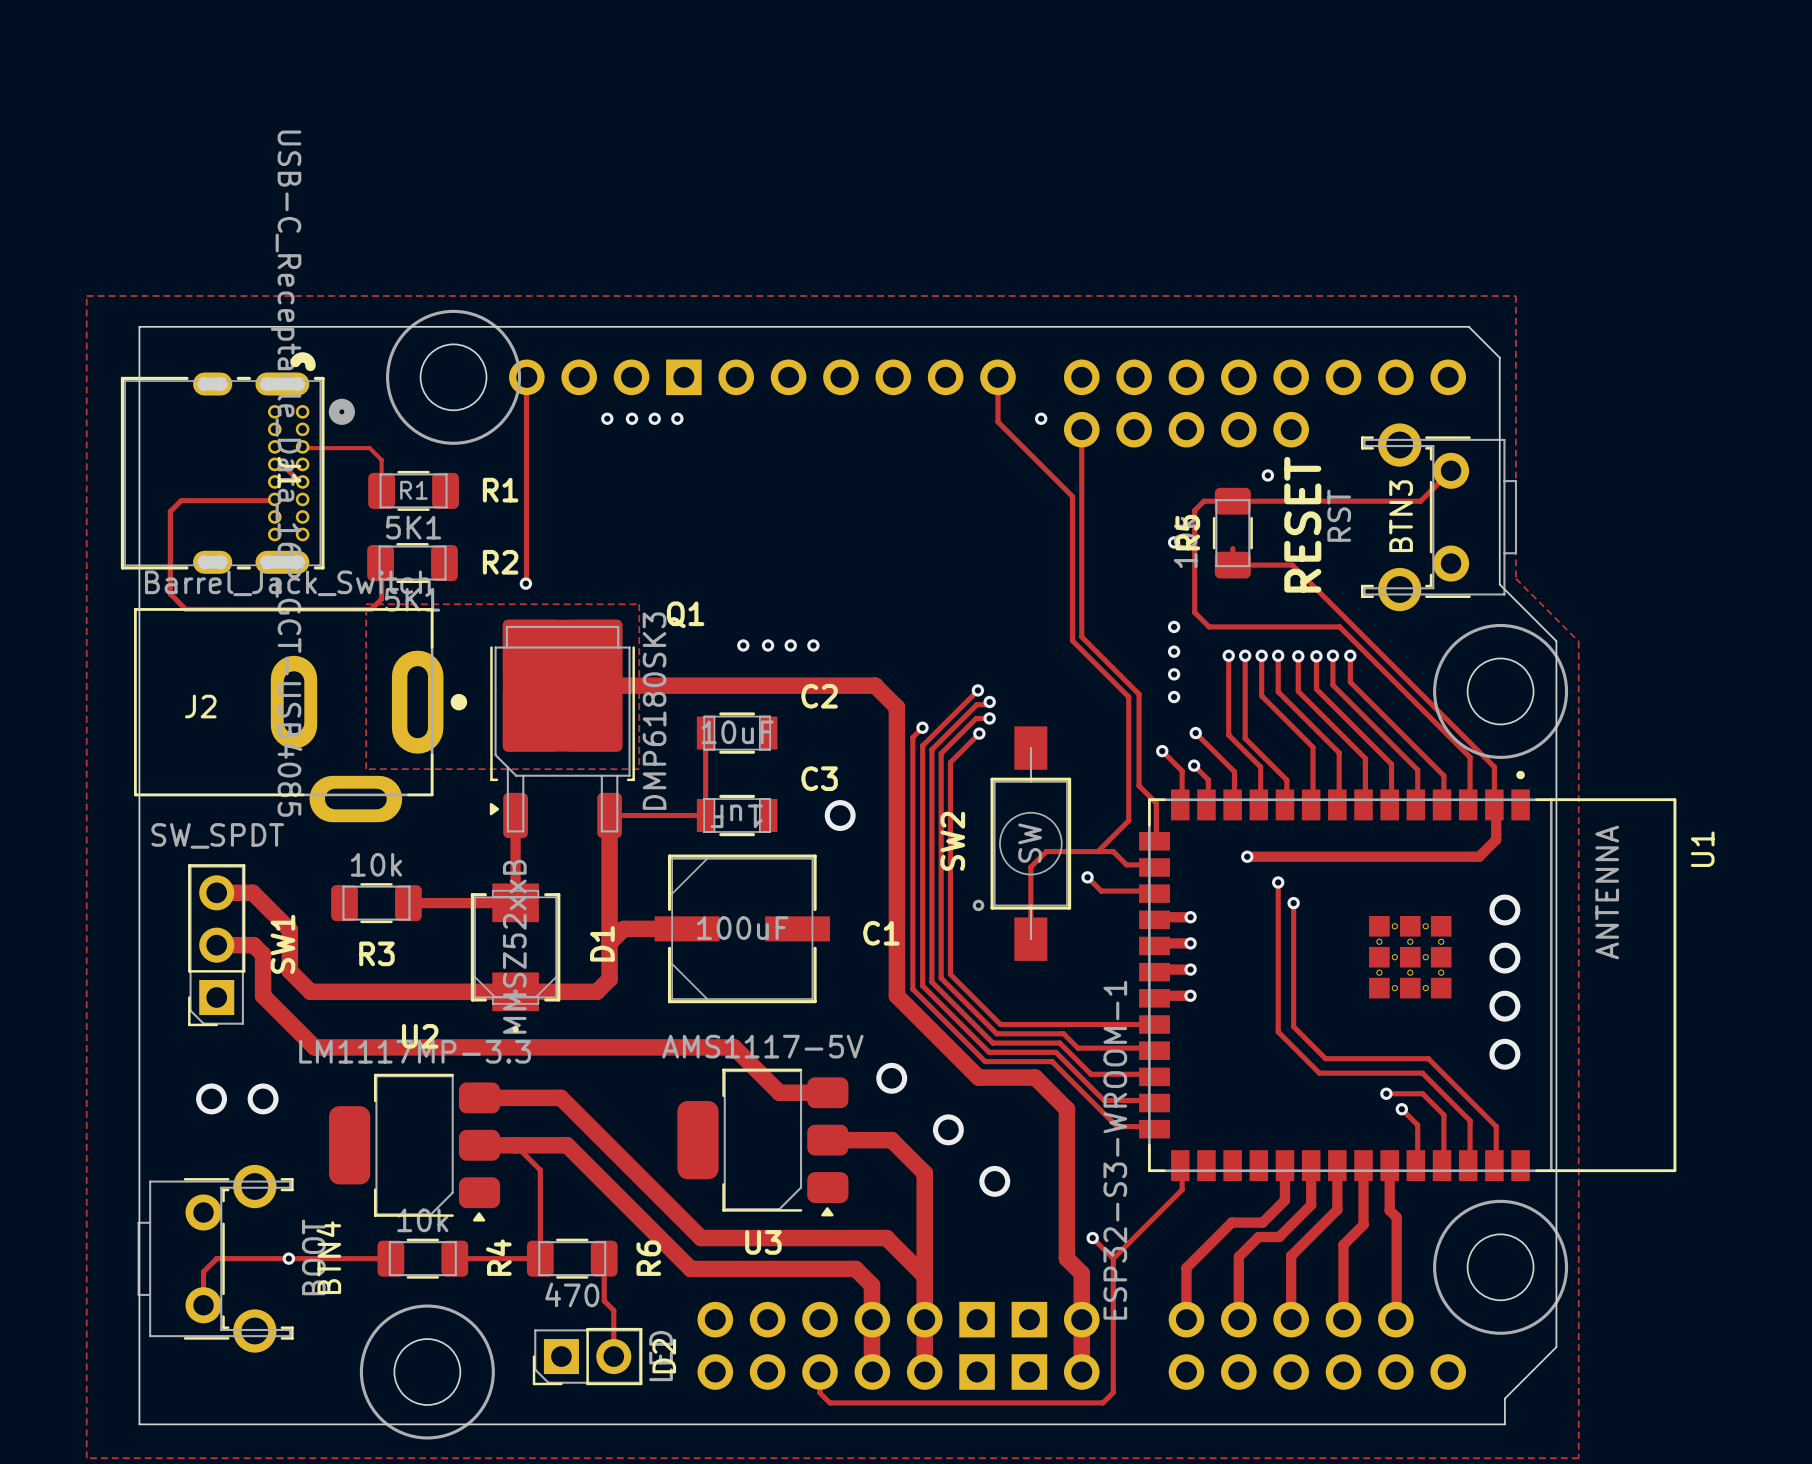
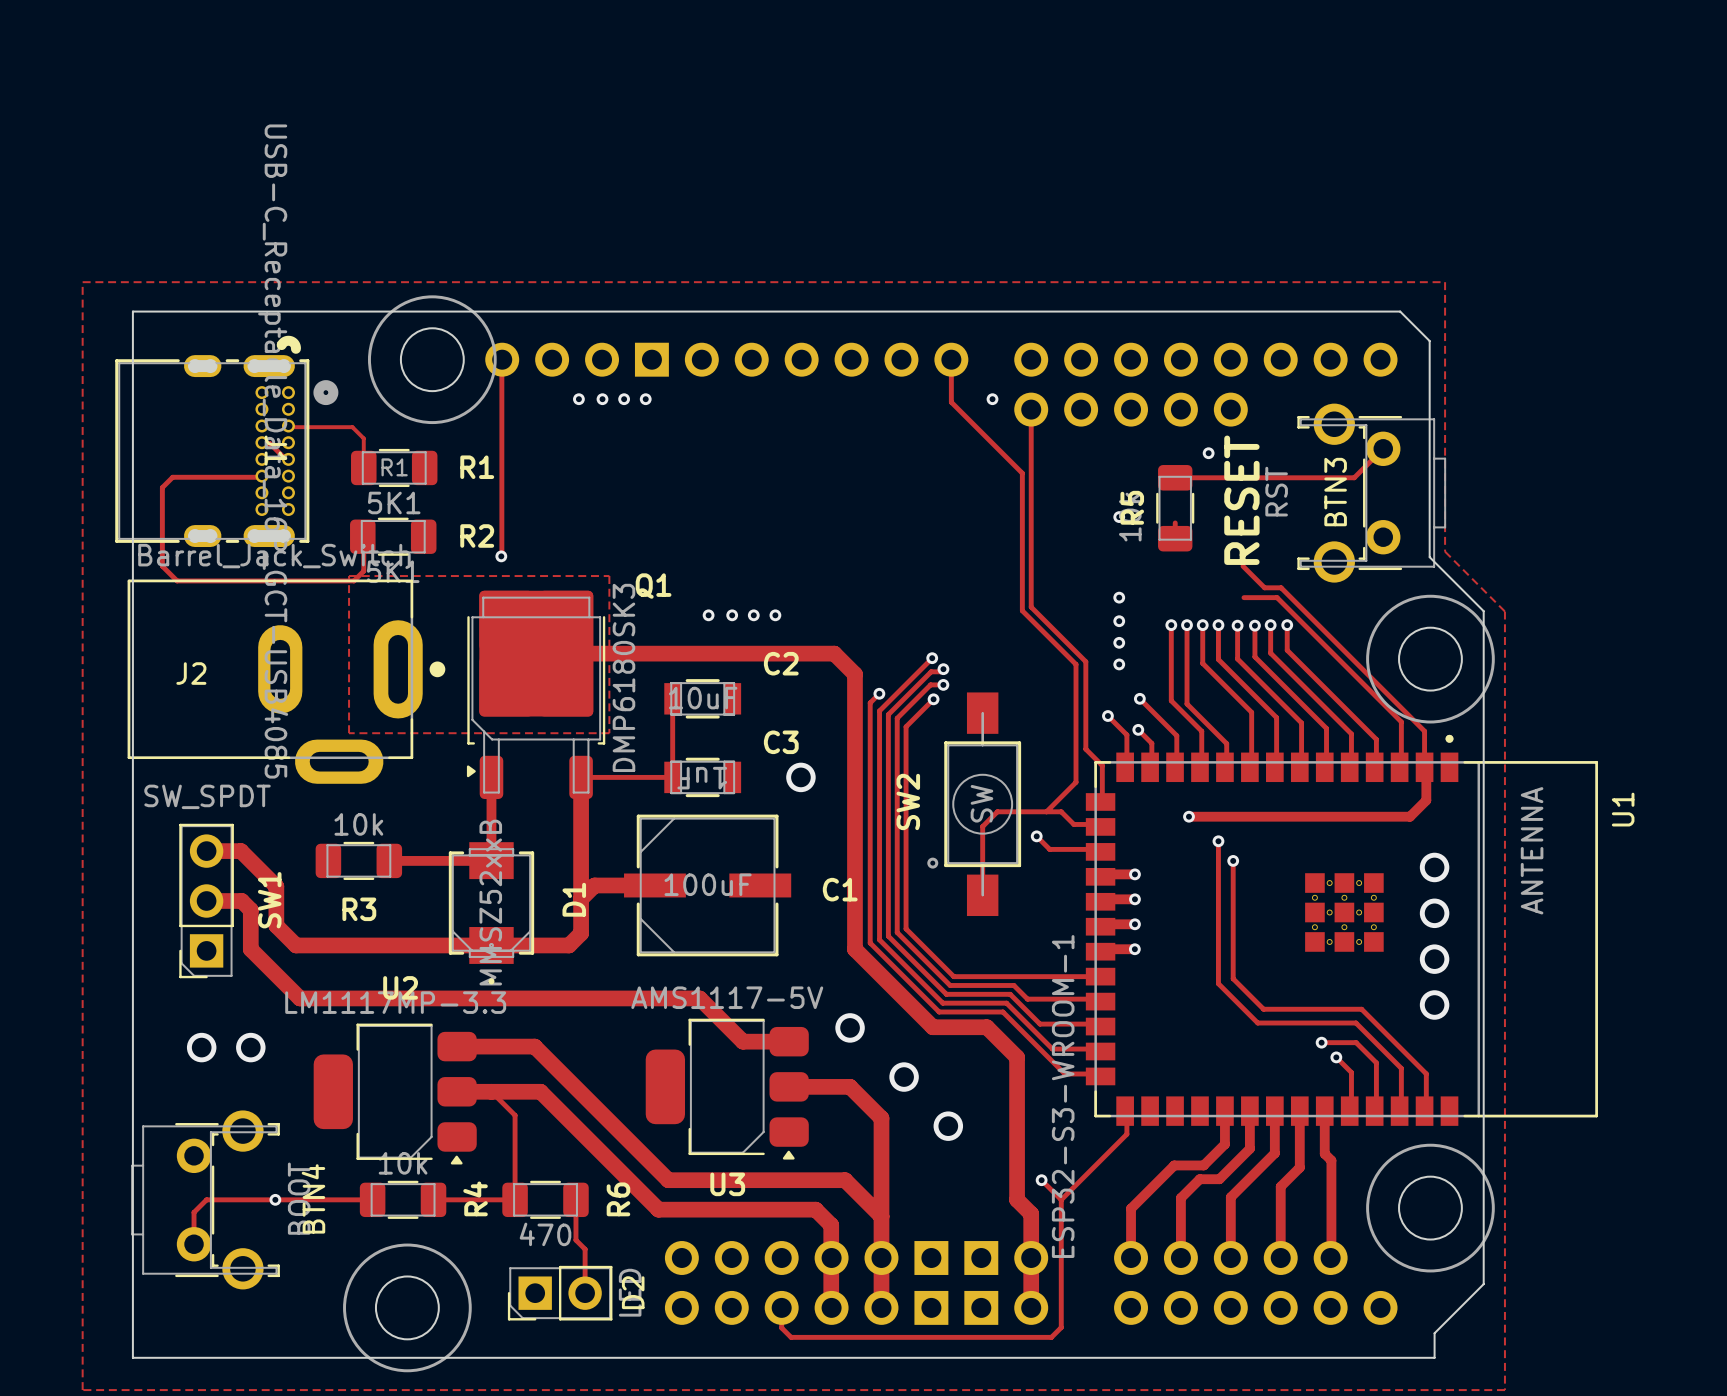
track: (1232, 501) (1203, 501) (1194, 510) (1194, 612) (1209, 626) (1304, 626) -> none
track: (1232, 565) (1292, 565) (1343, 616) -> (1243, 566) (1264, 587) (1281, 587)

